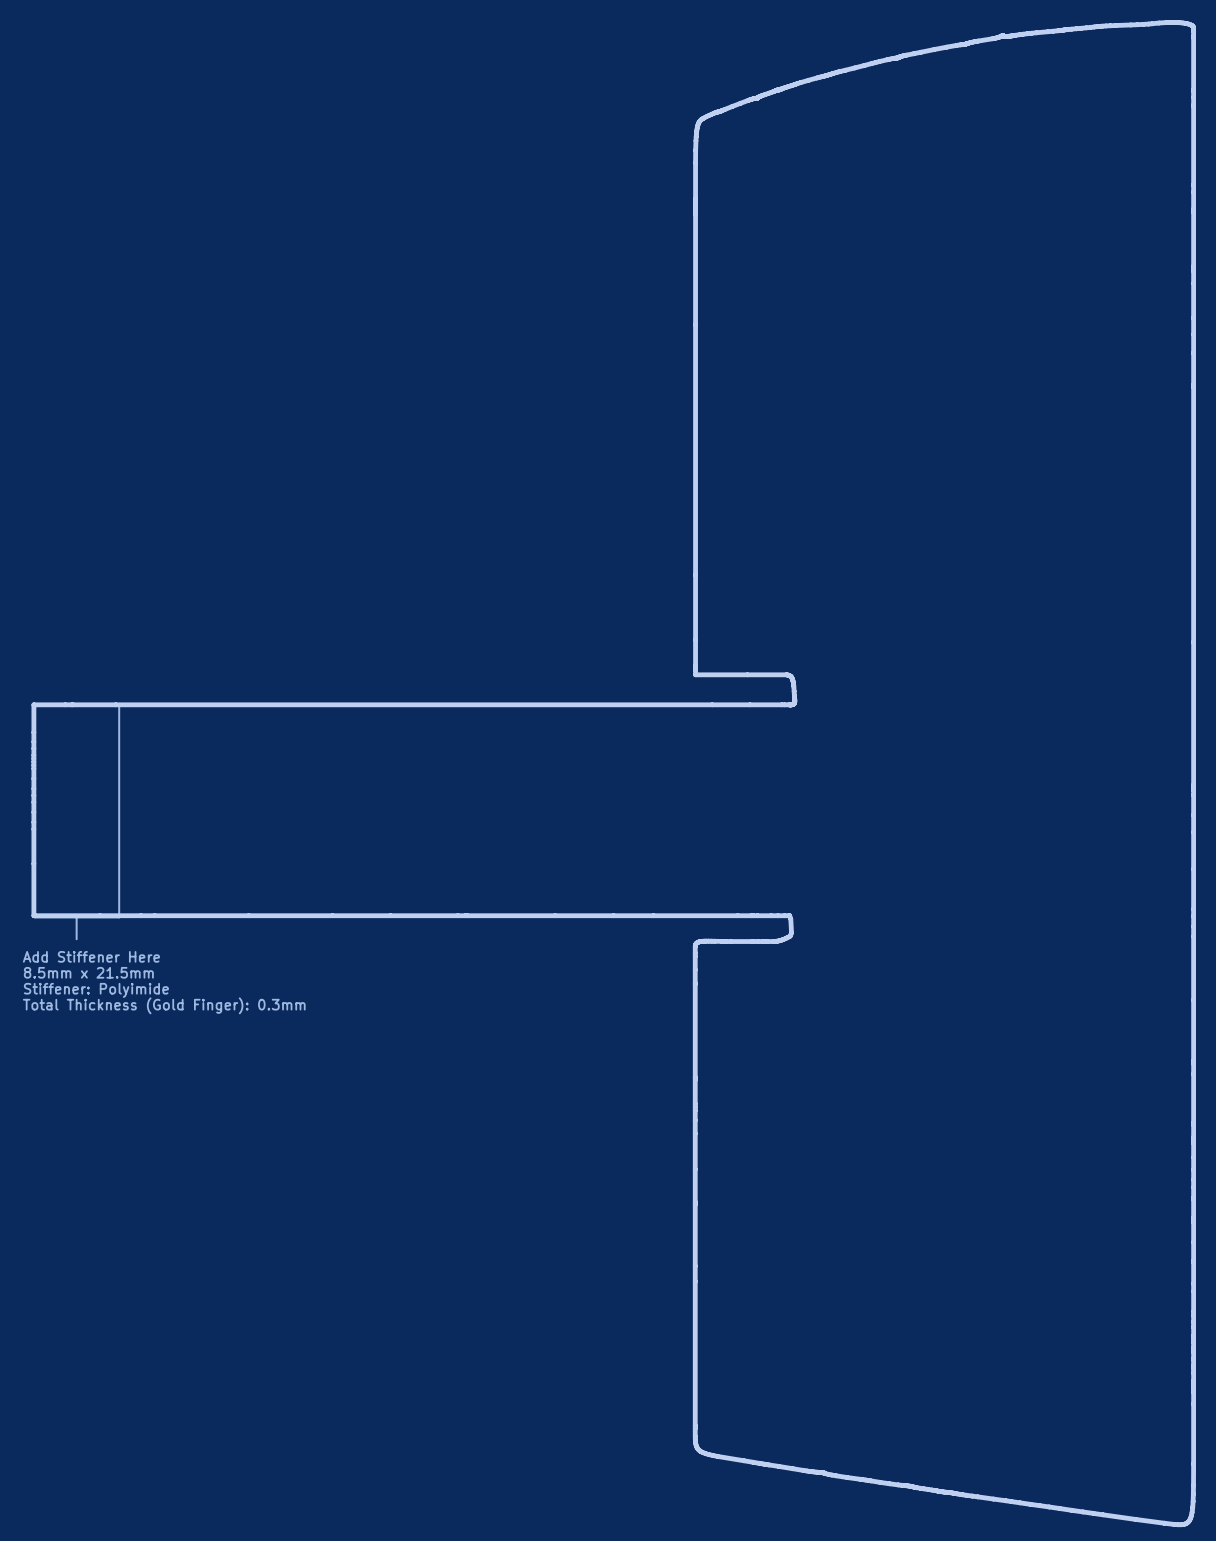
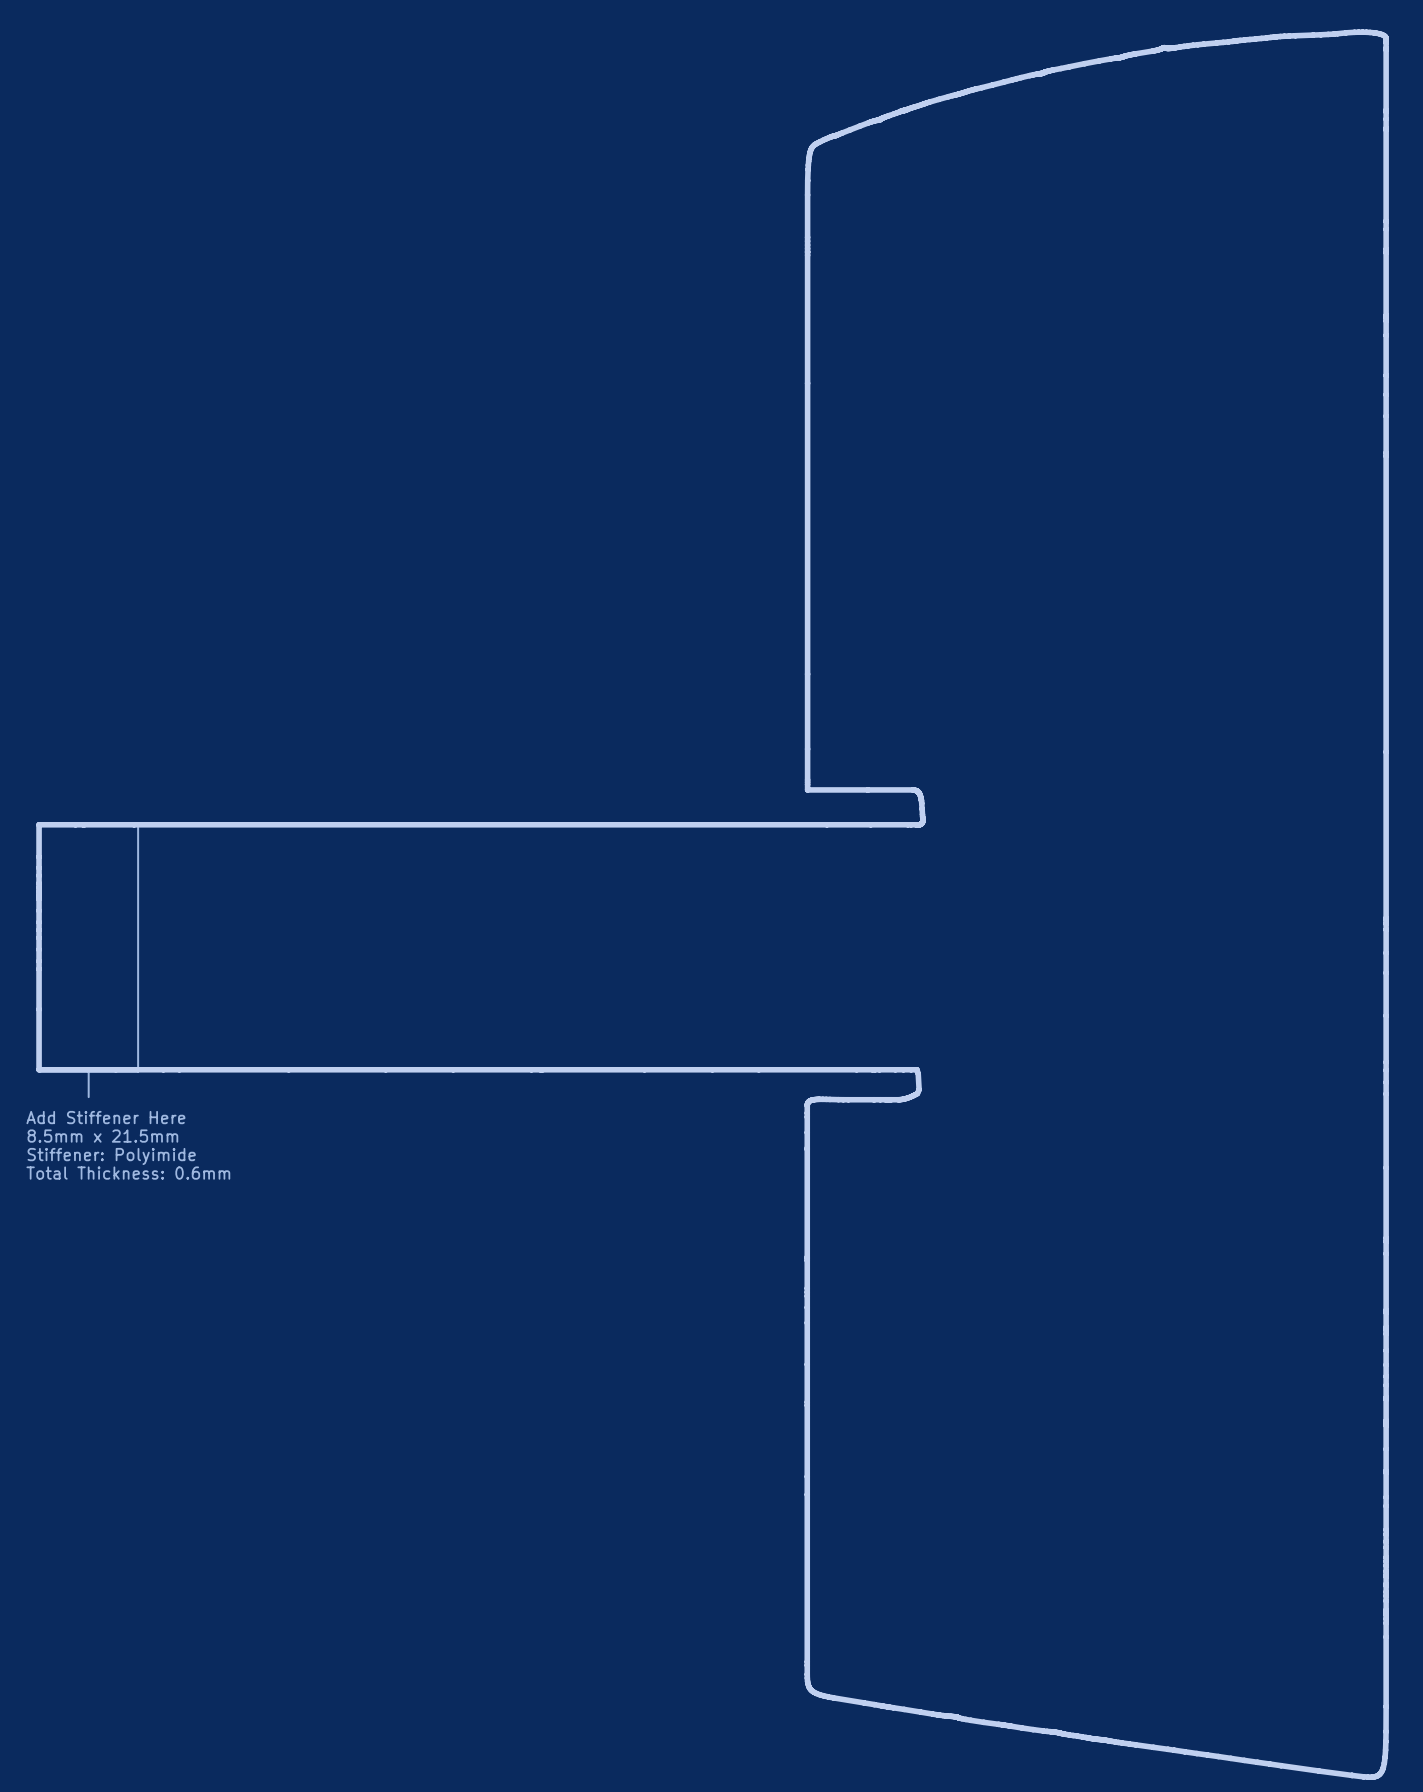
text: Total Thickness (Gold Finger): 0.3mm (164, 1005) -> Total Thickness: 0.6mm (128, 1173)

